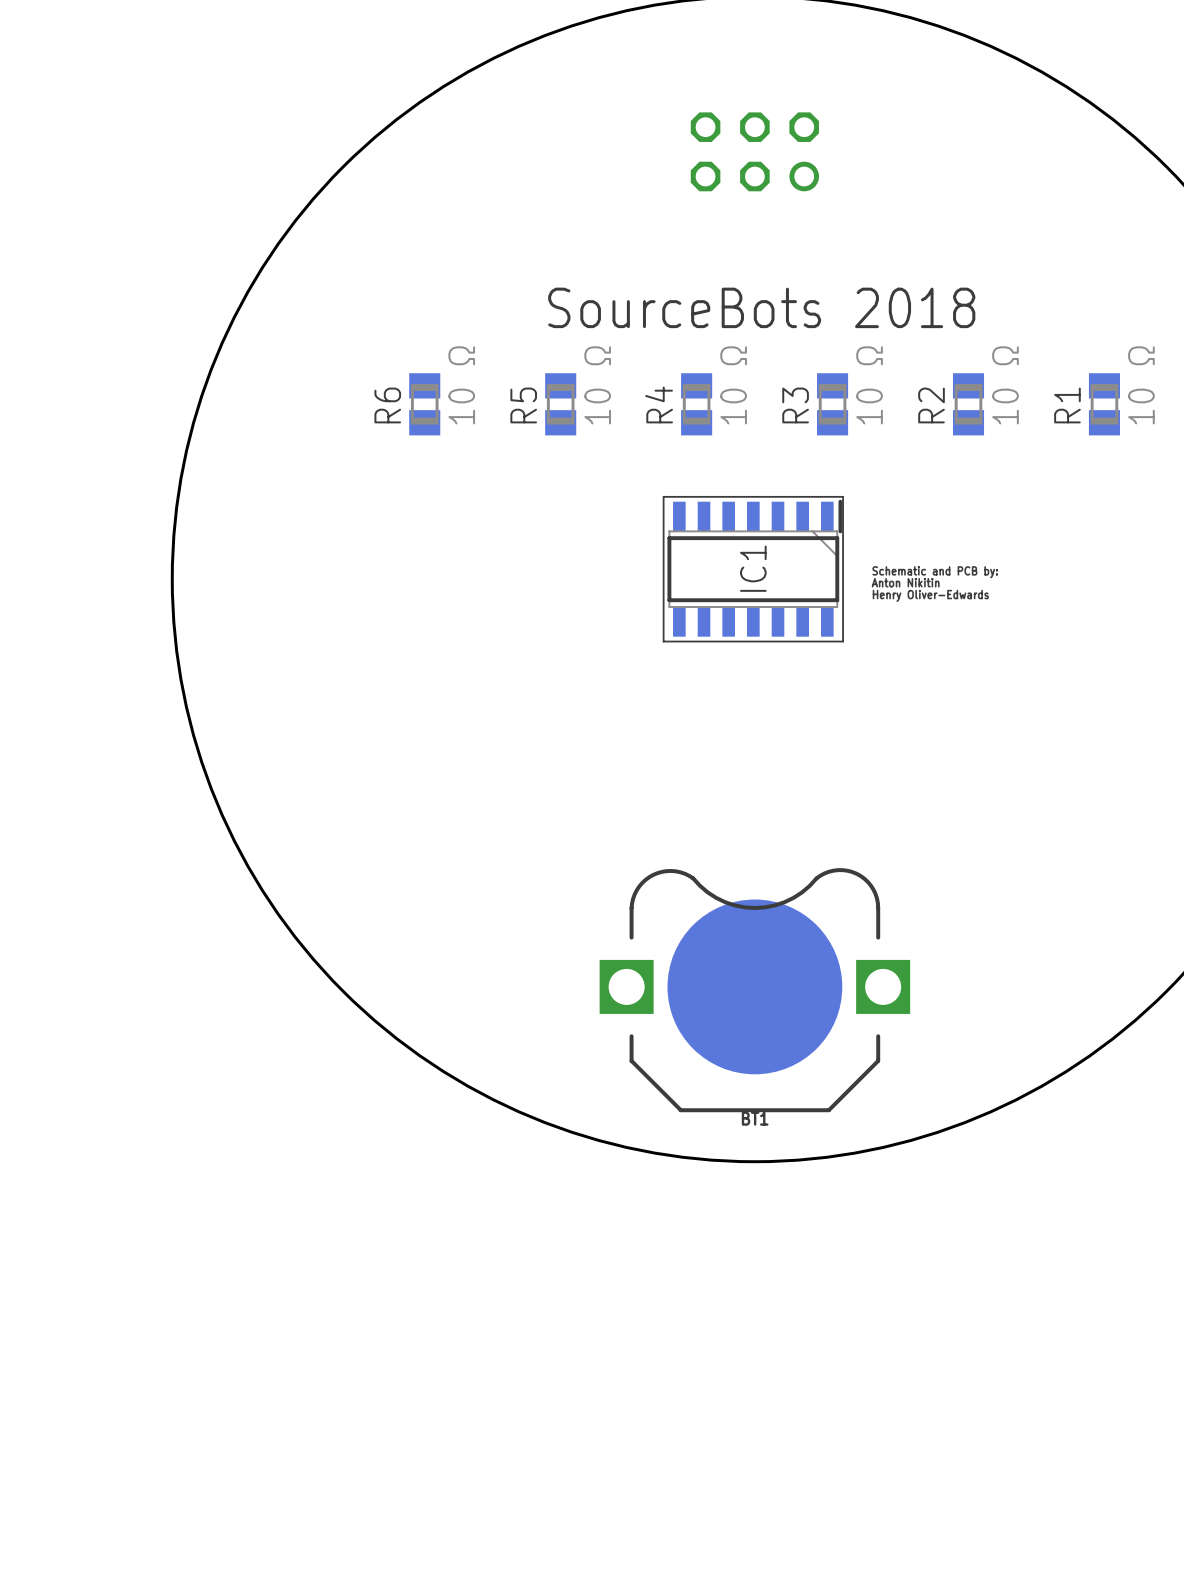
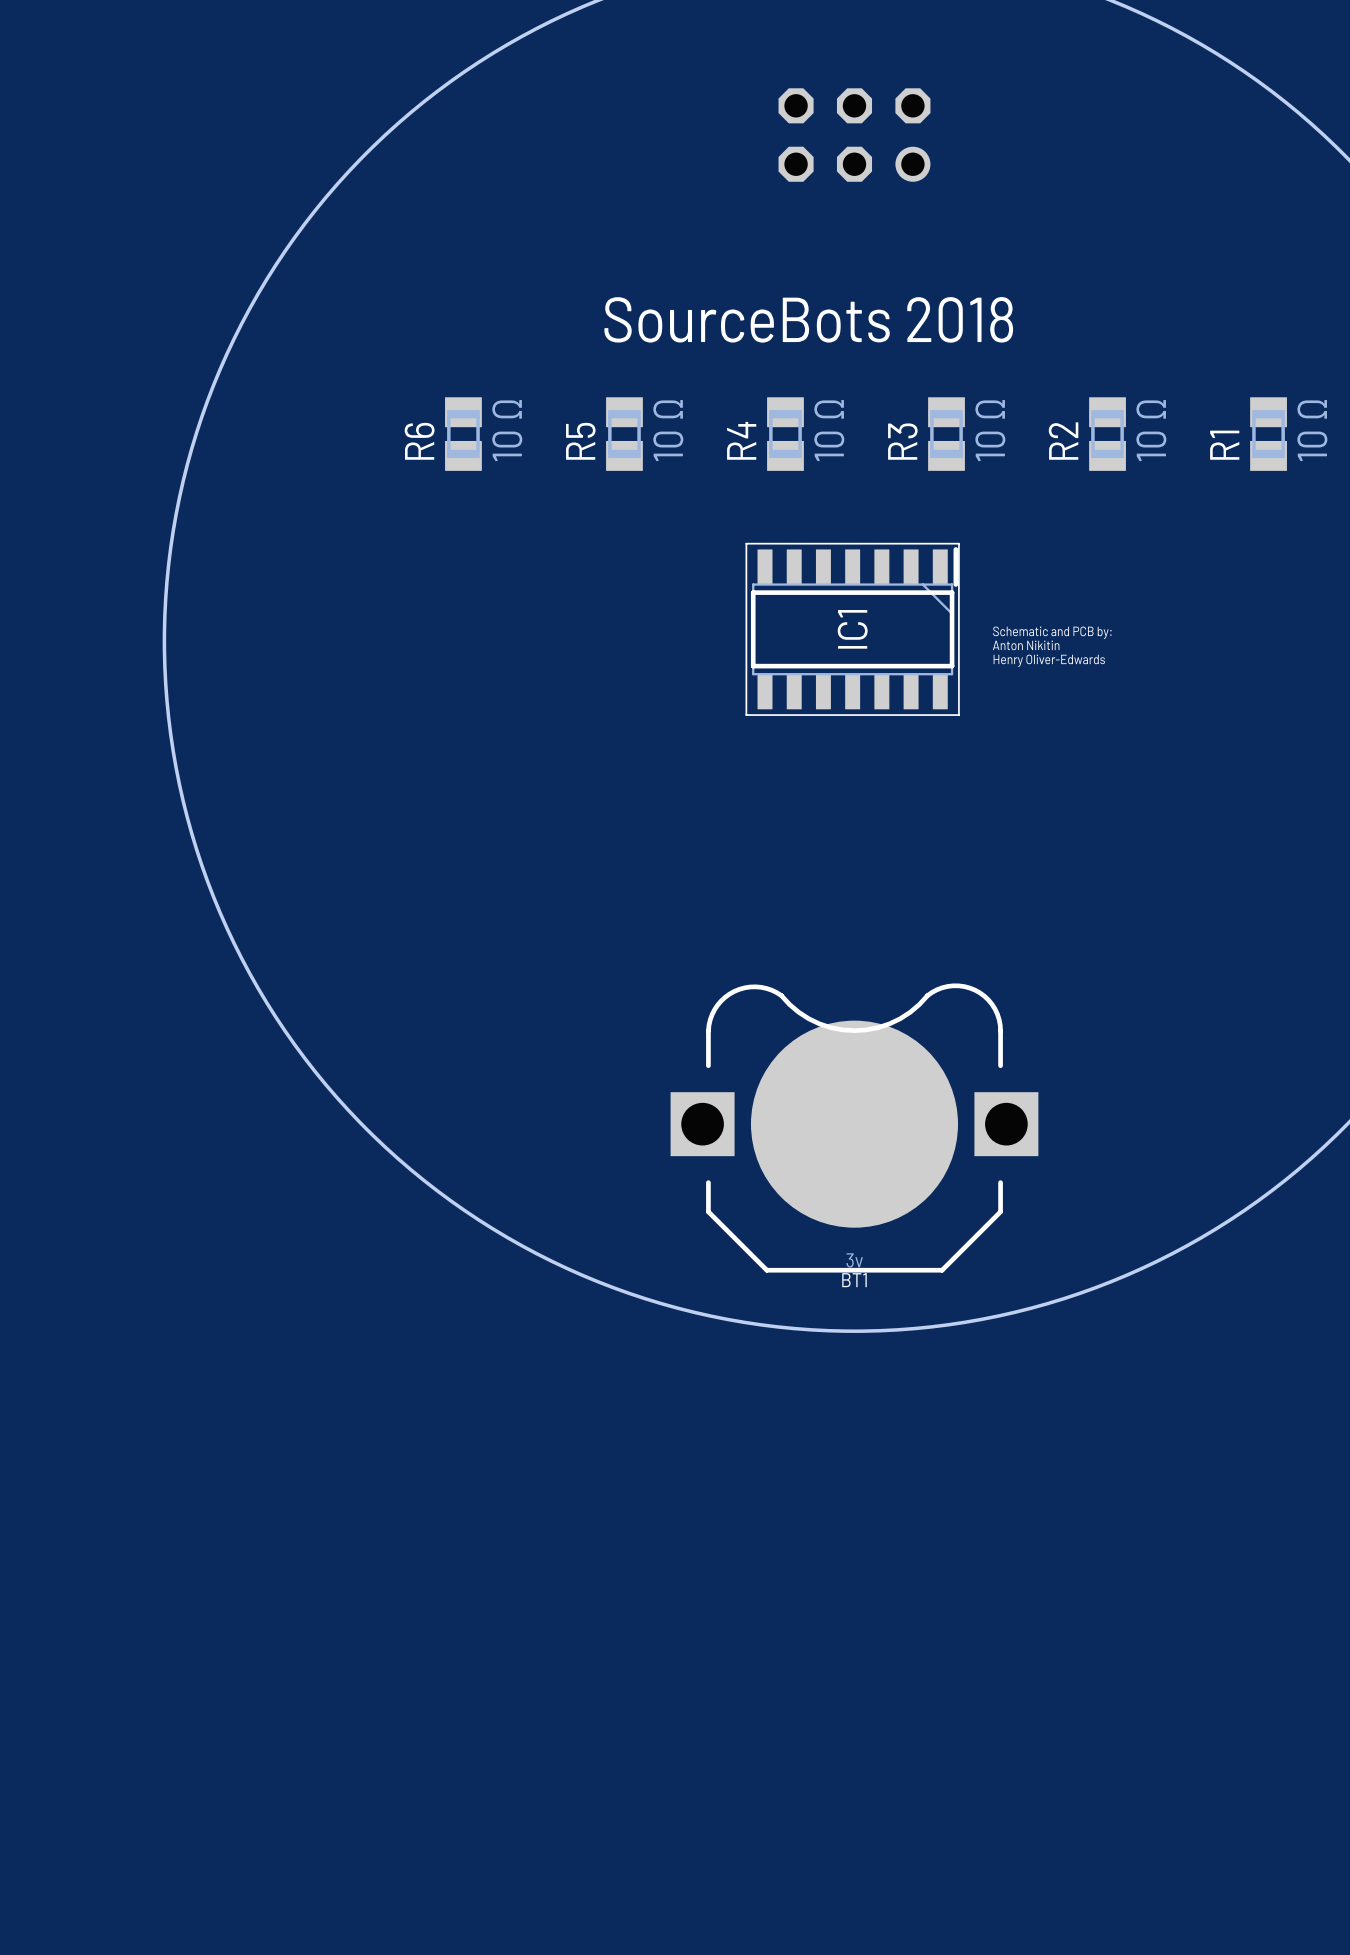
BT1 value: none -> 3v (854, 1260)

